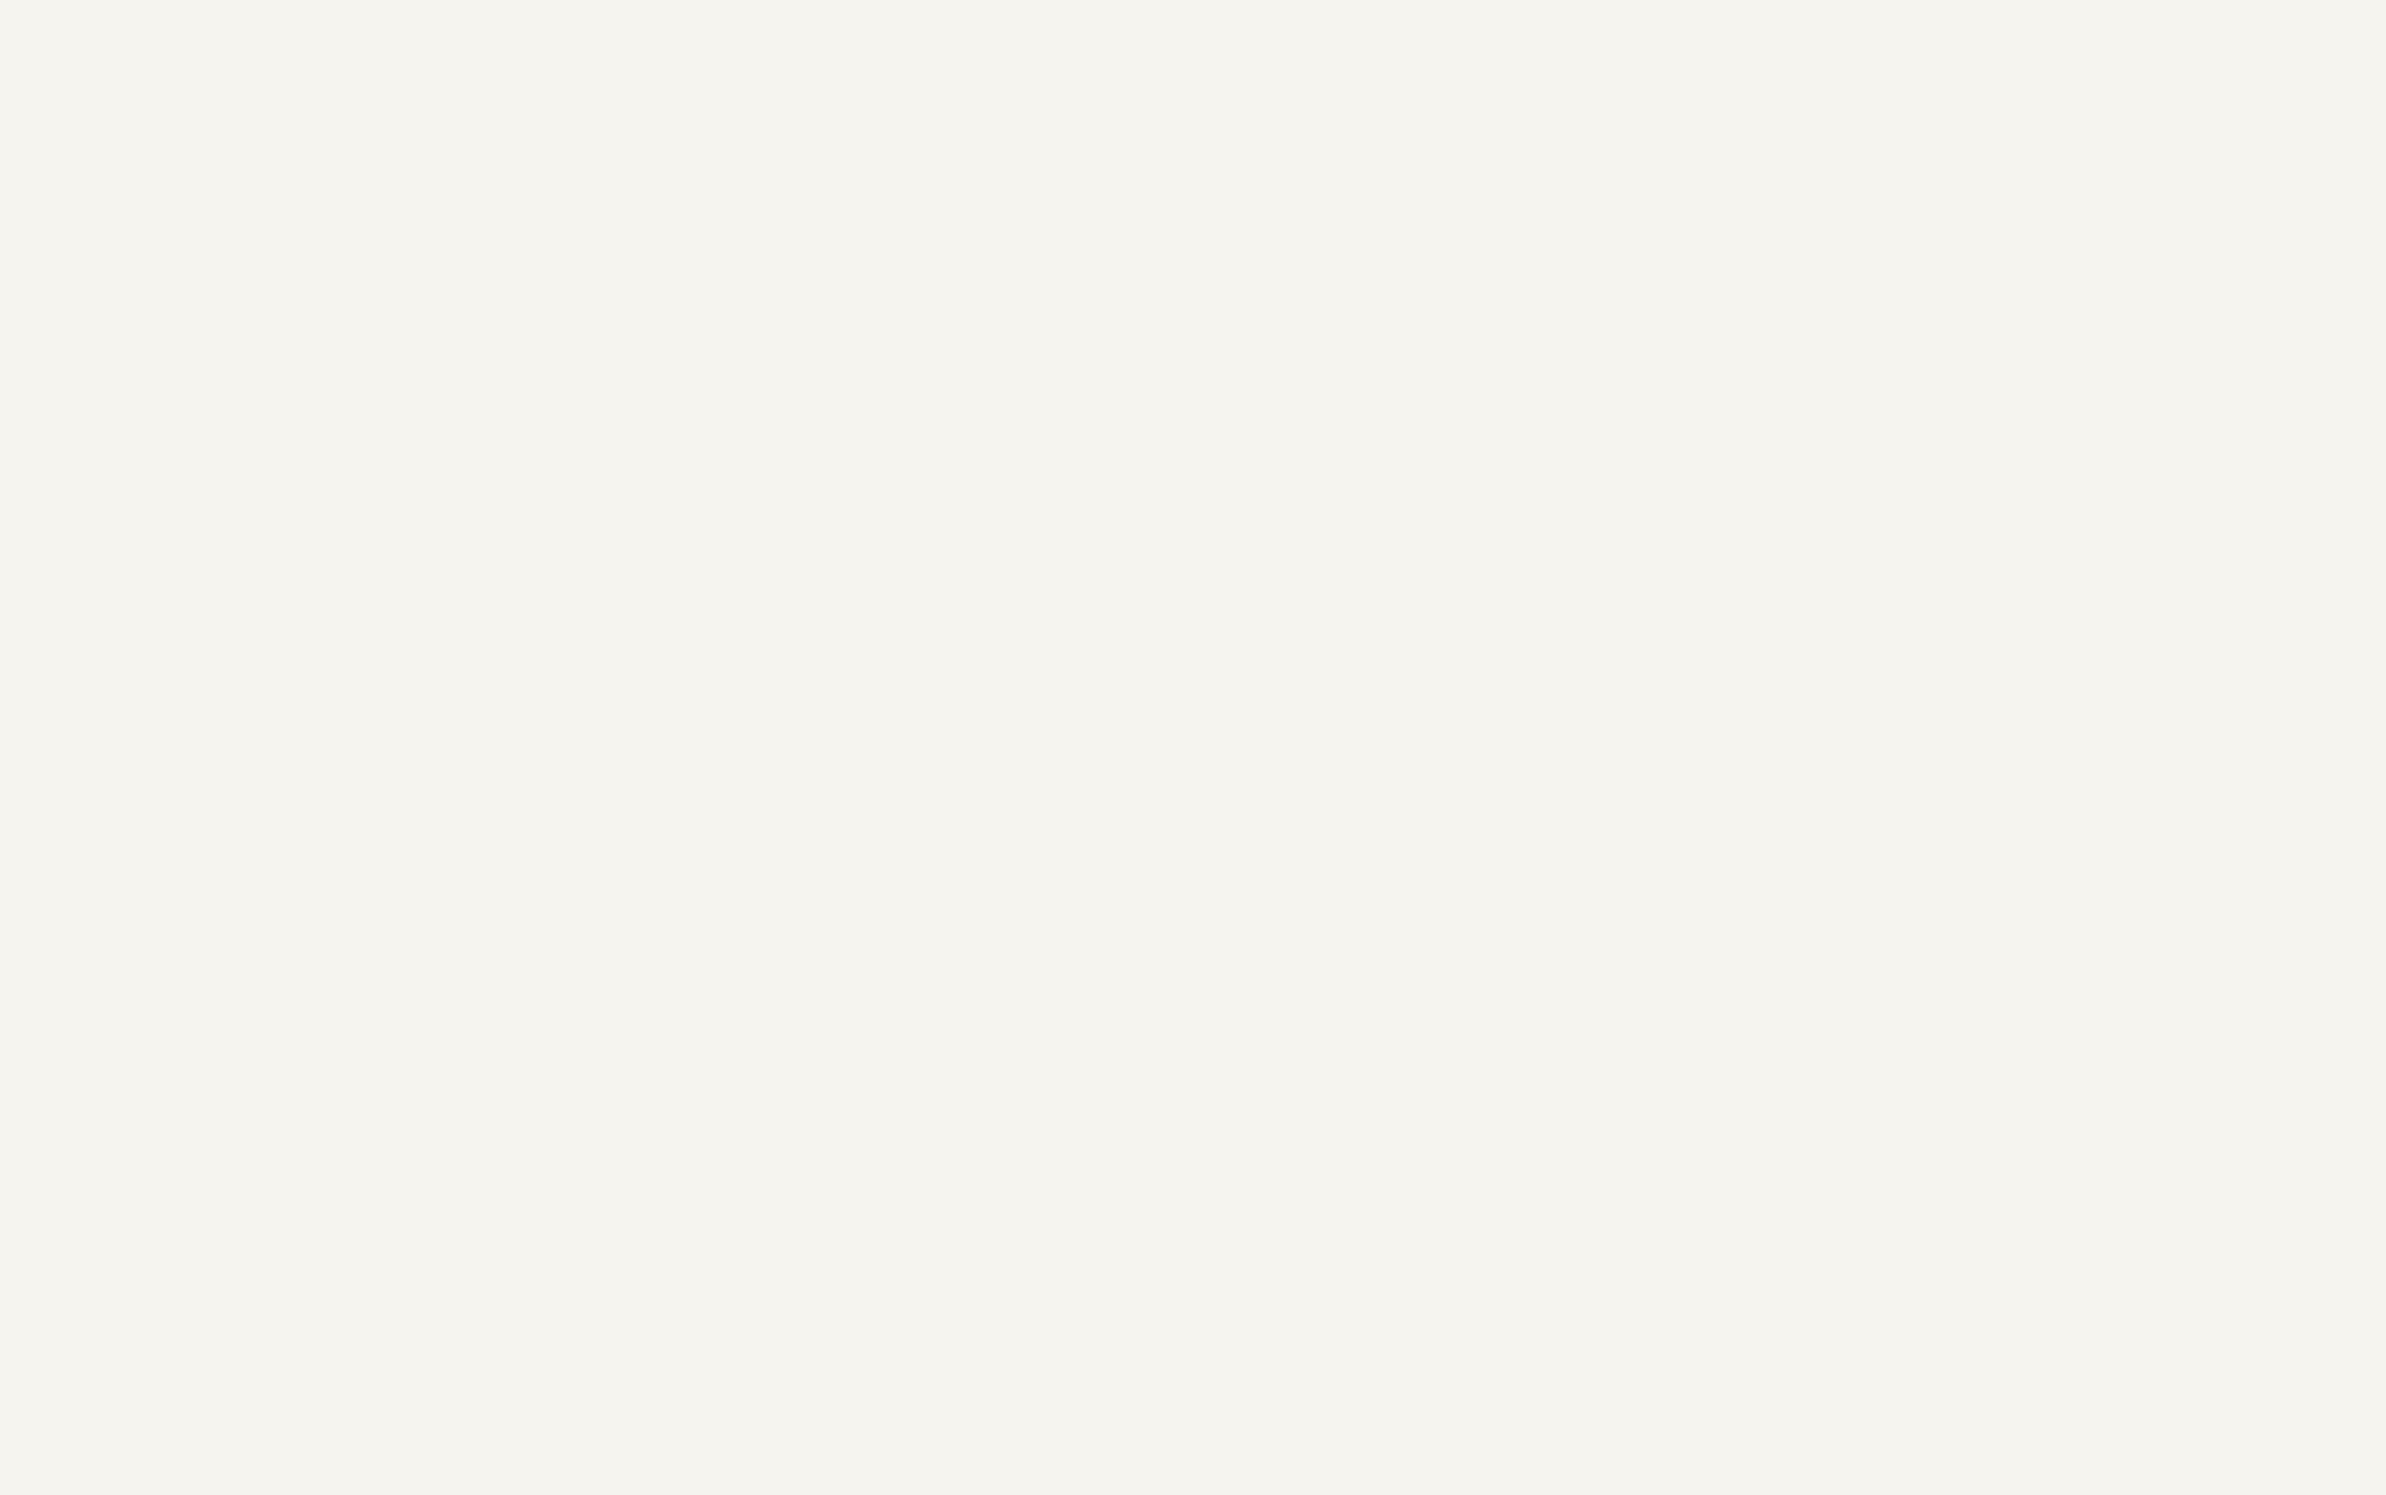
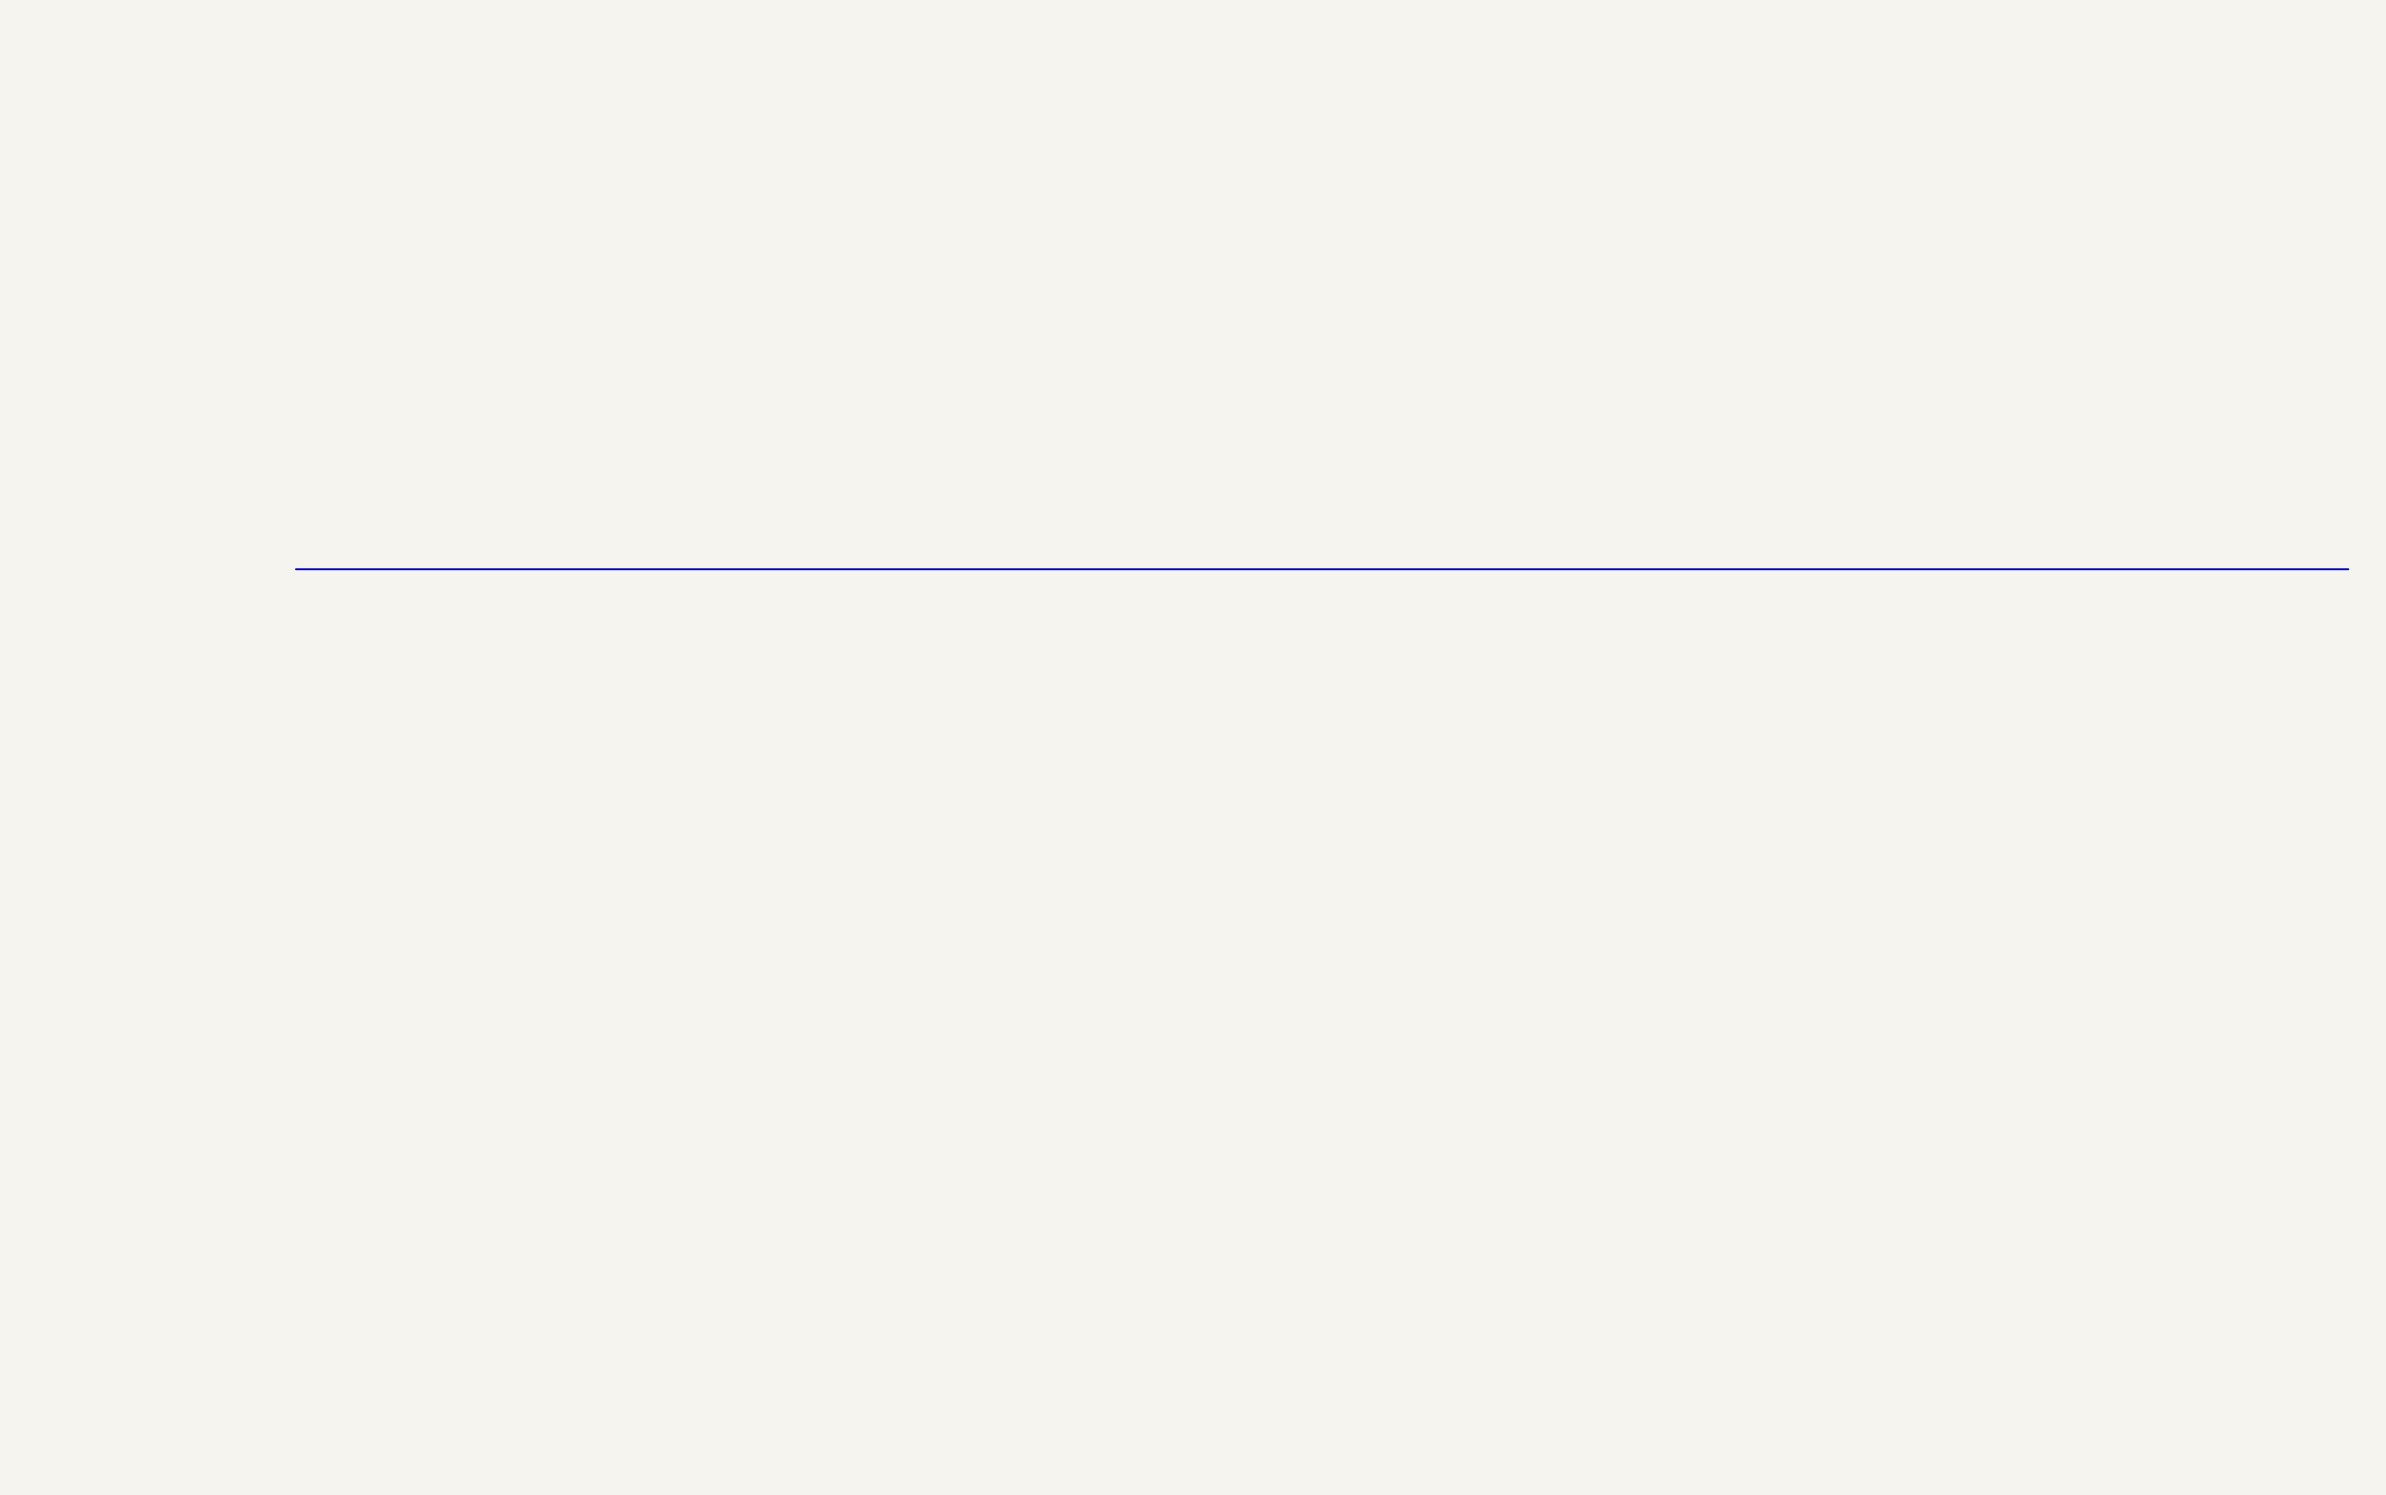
line: none -> (295, 569) (2348, 569)

